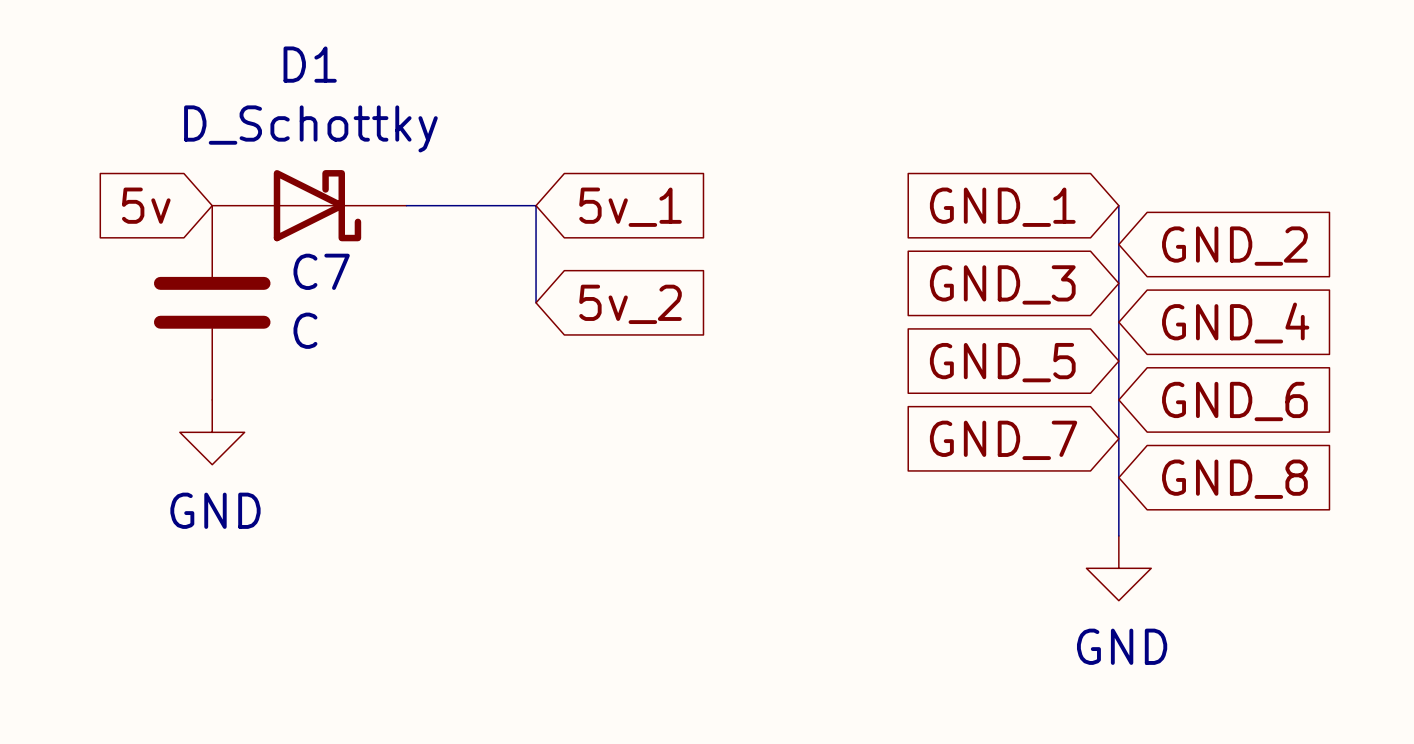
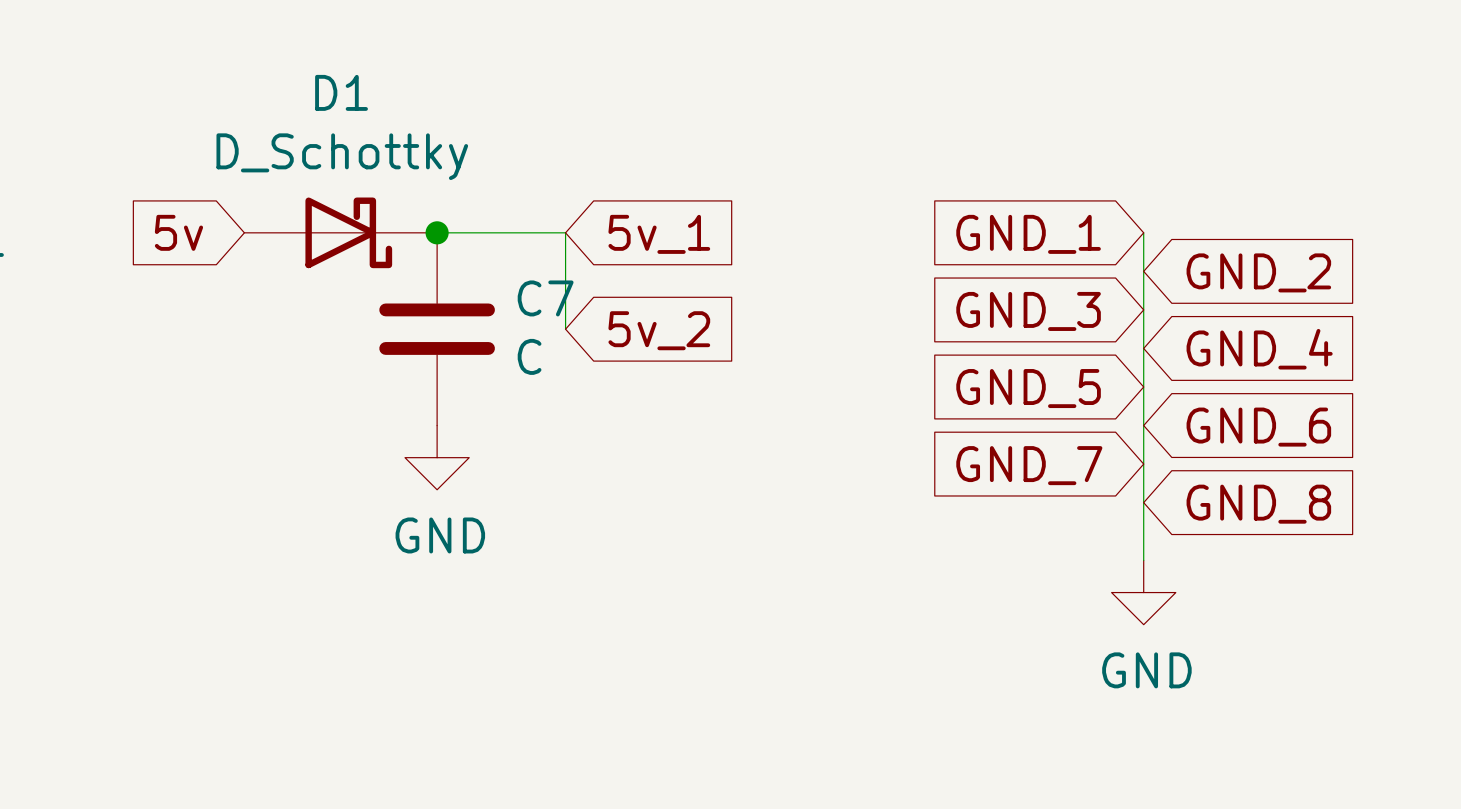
junction: none -> (437, 232)
C7 position: (212, 302) -> (437, 329)
power symbol position: GND (212, 432) -> GND (437, 457)

